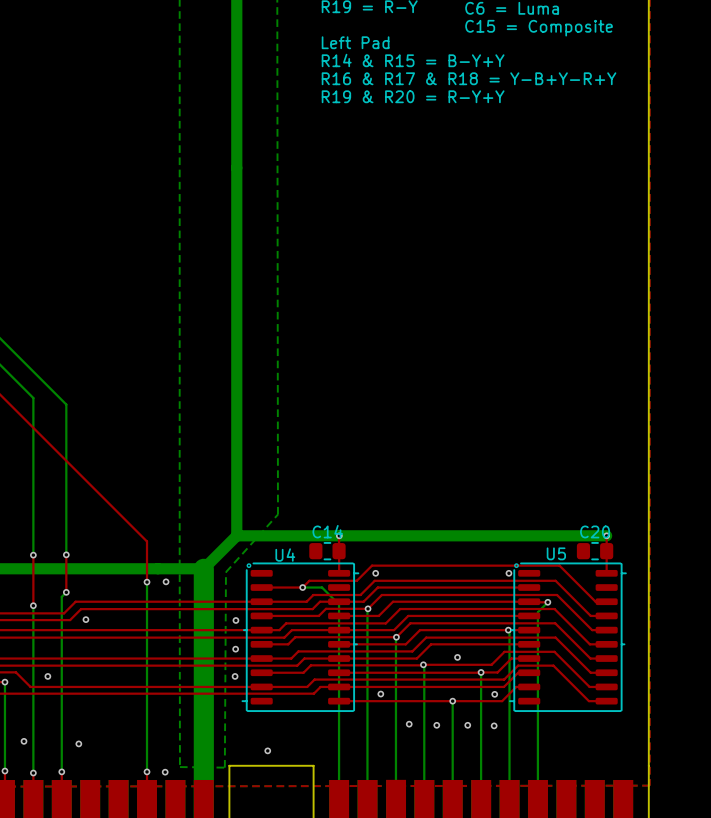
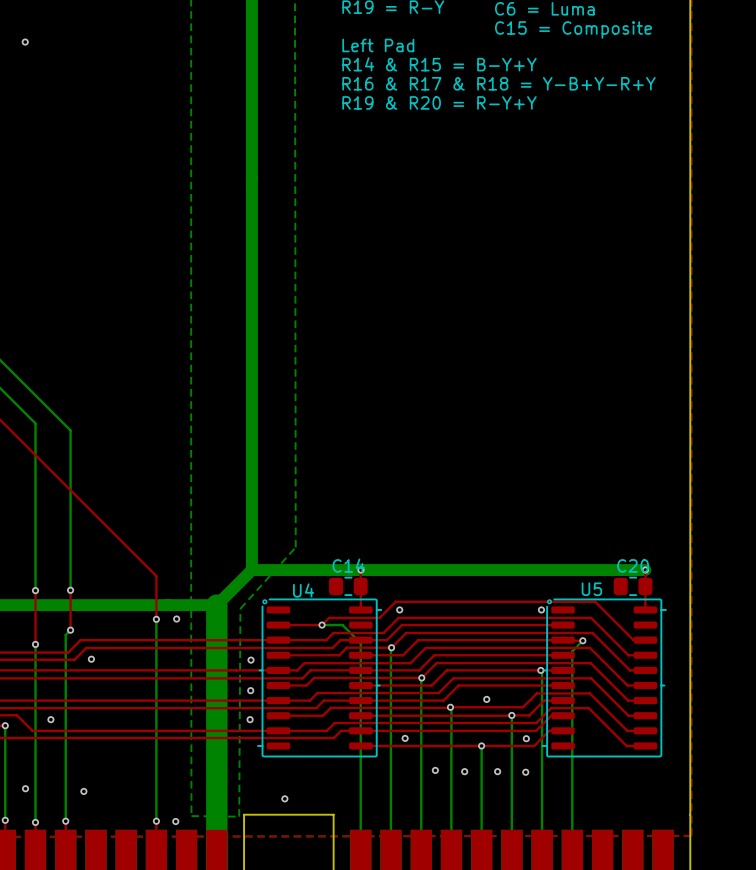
via: none -> (25, 42)

